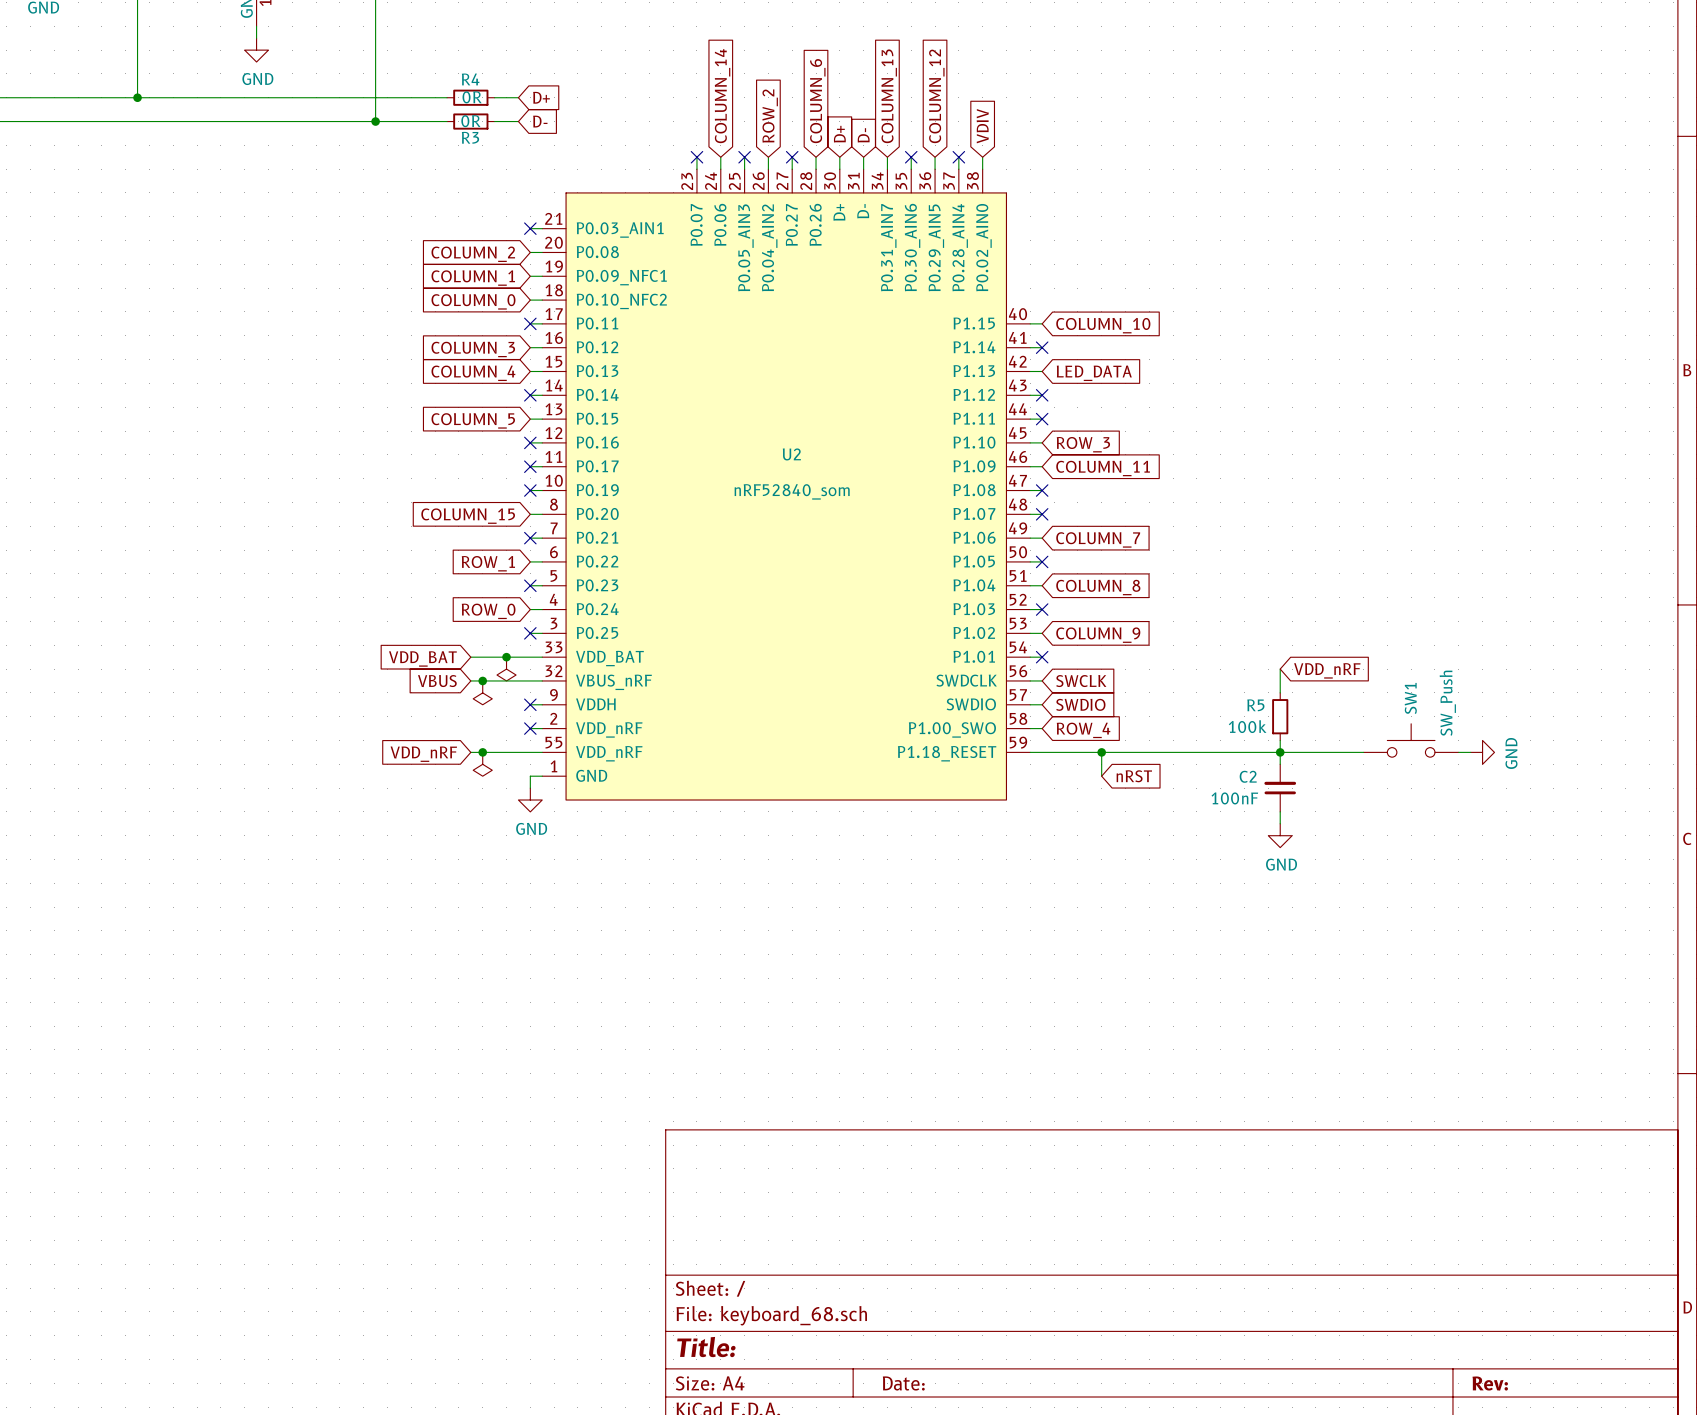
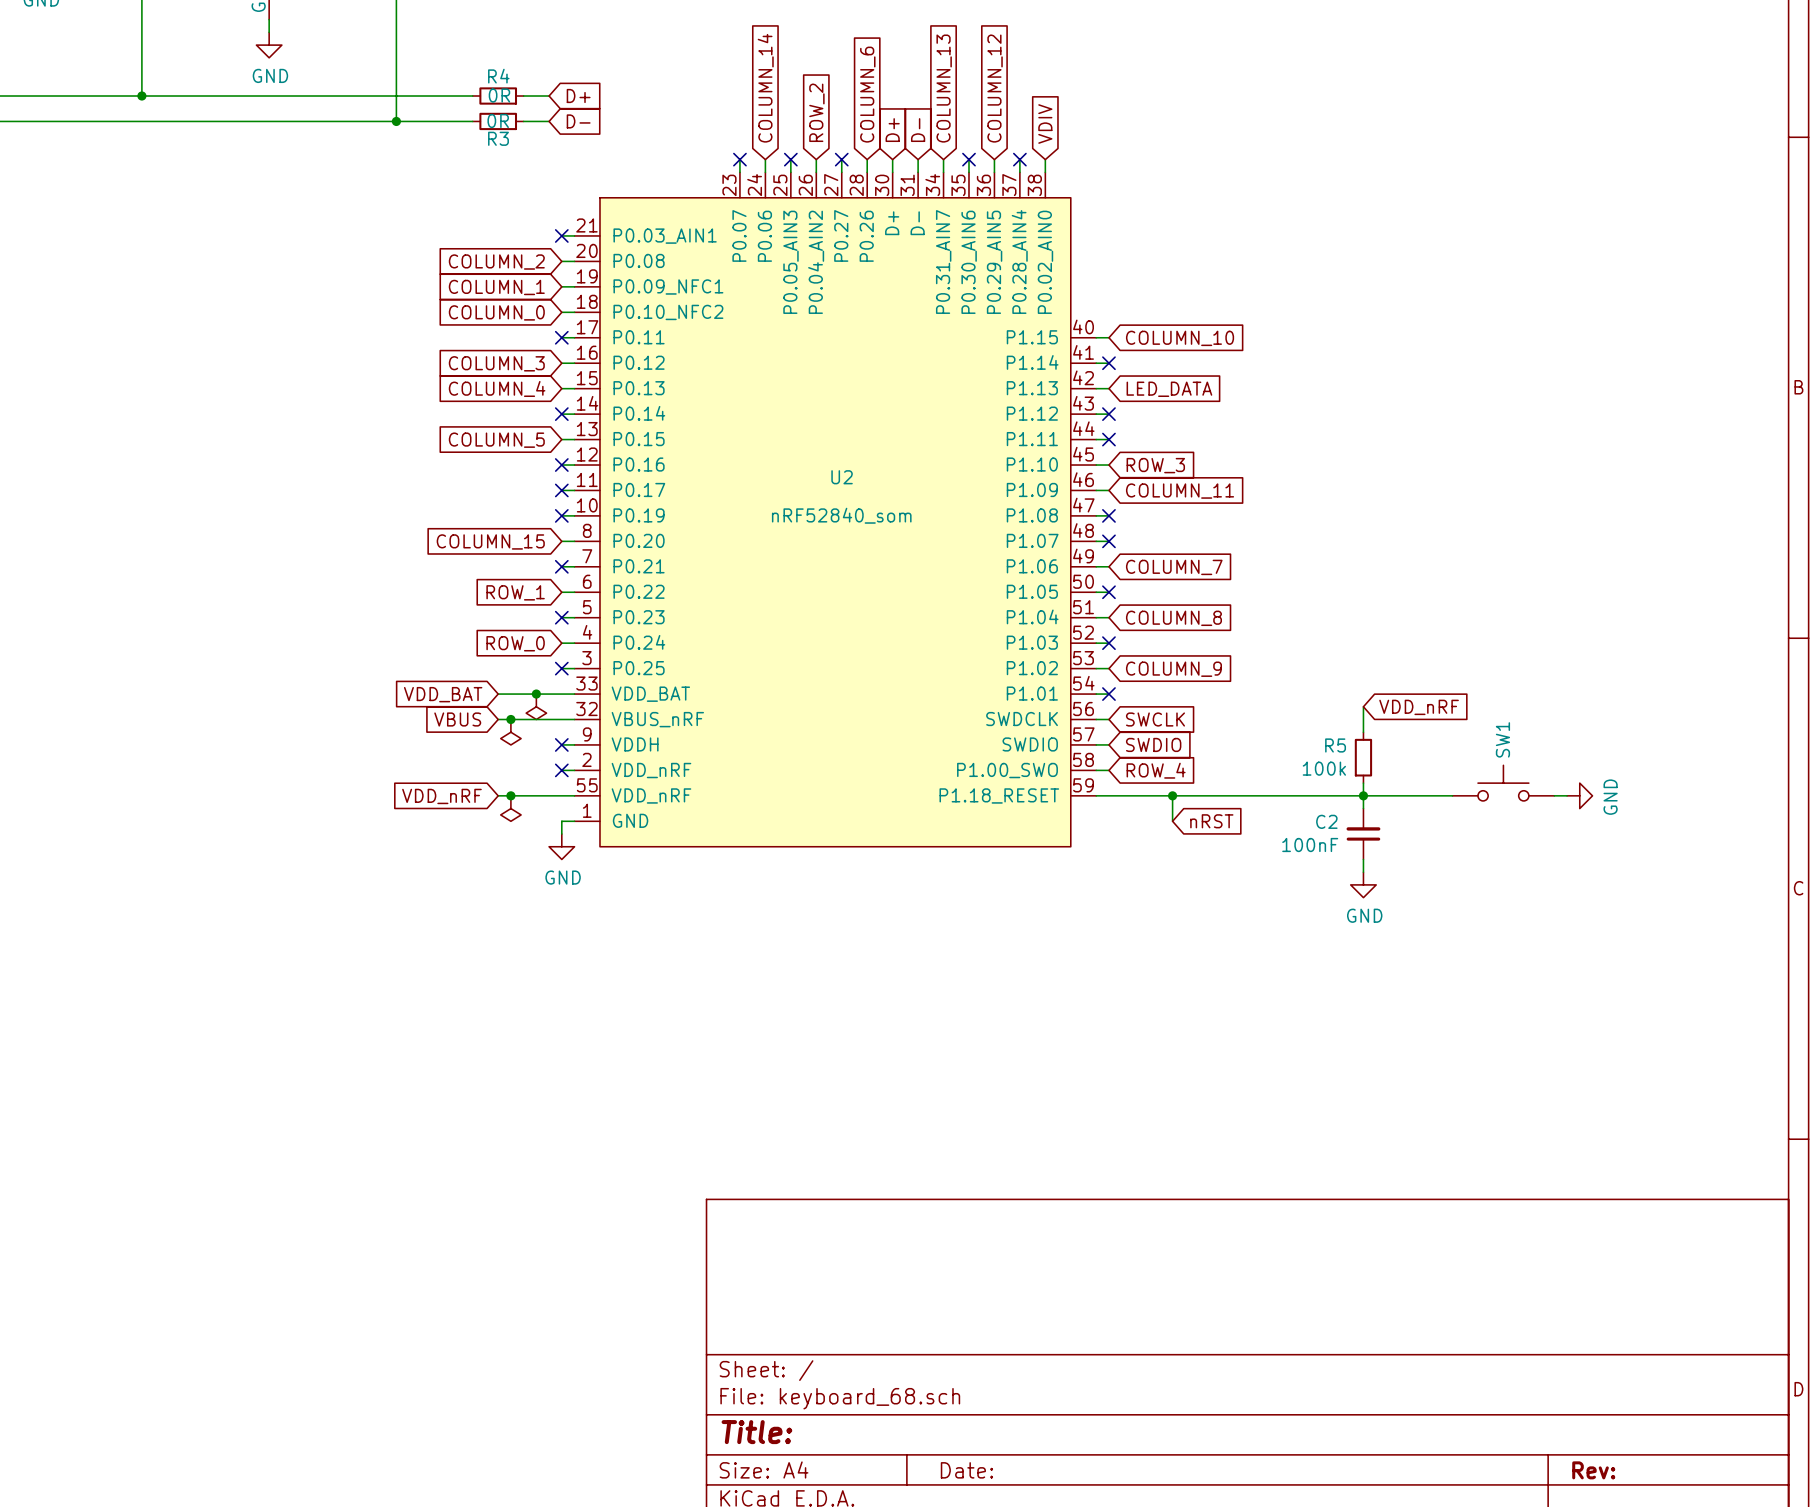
SW1 value: SW_Push (1447, 703) -> none

